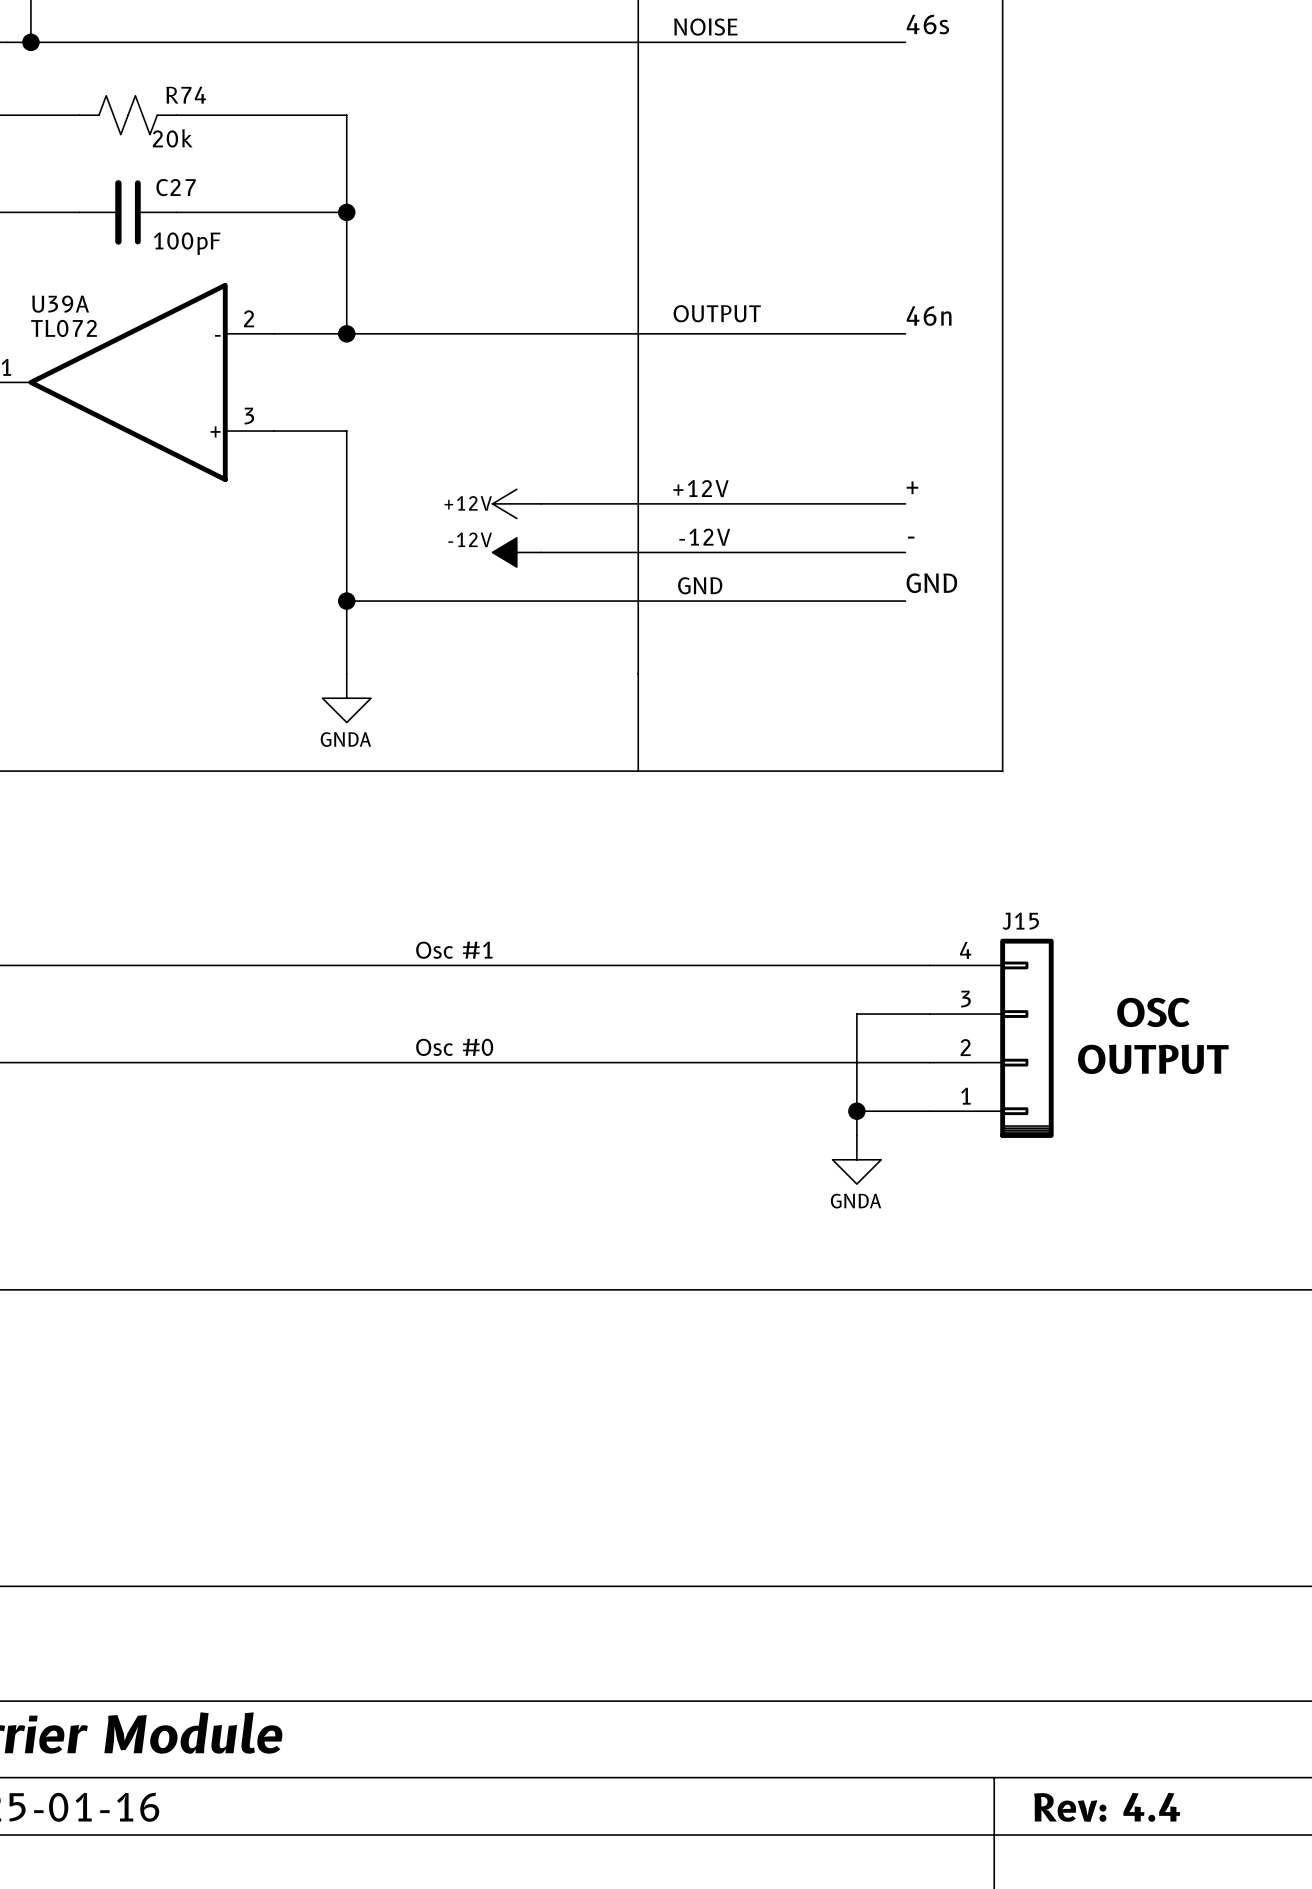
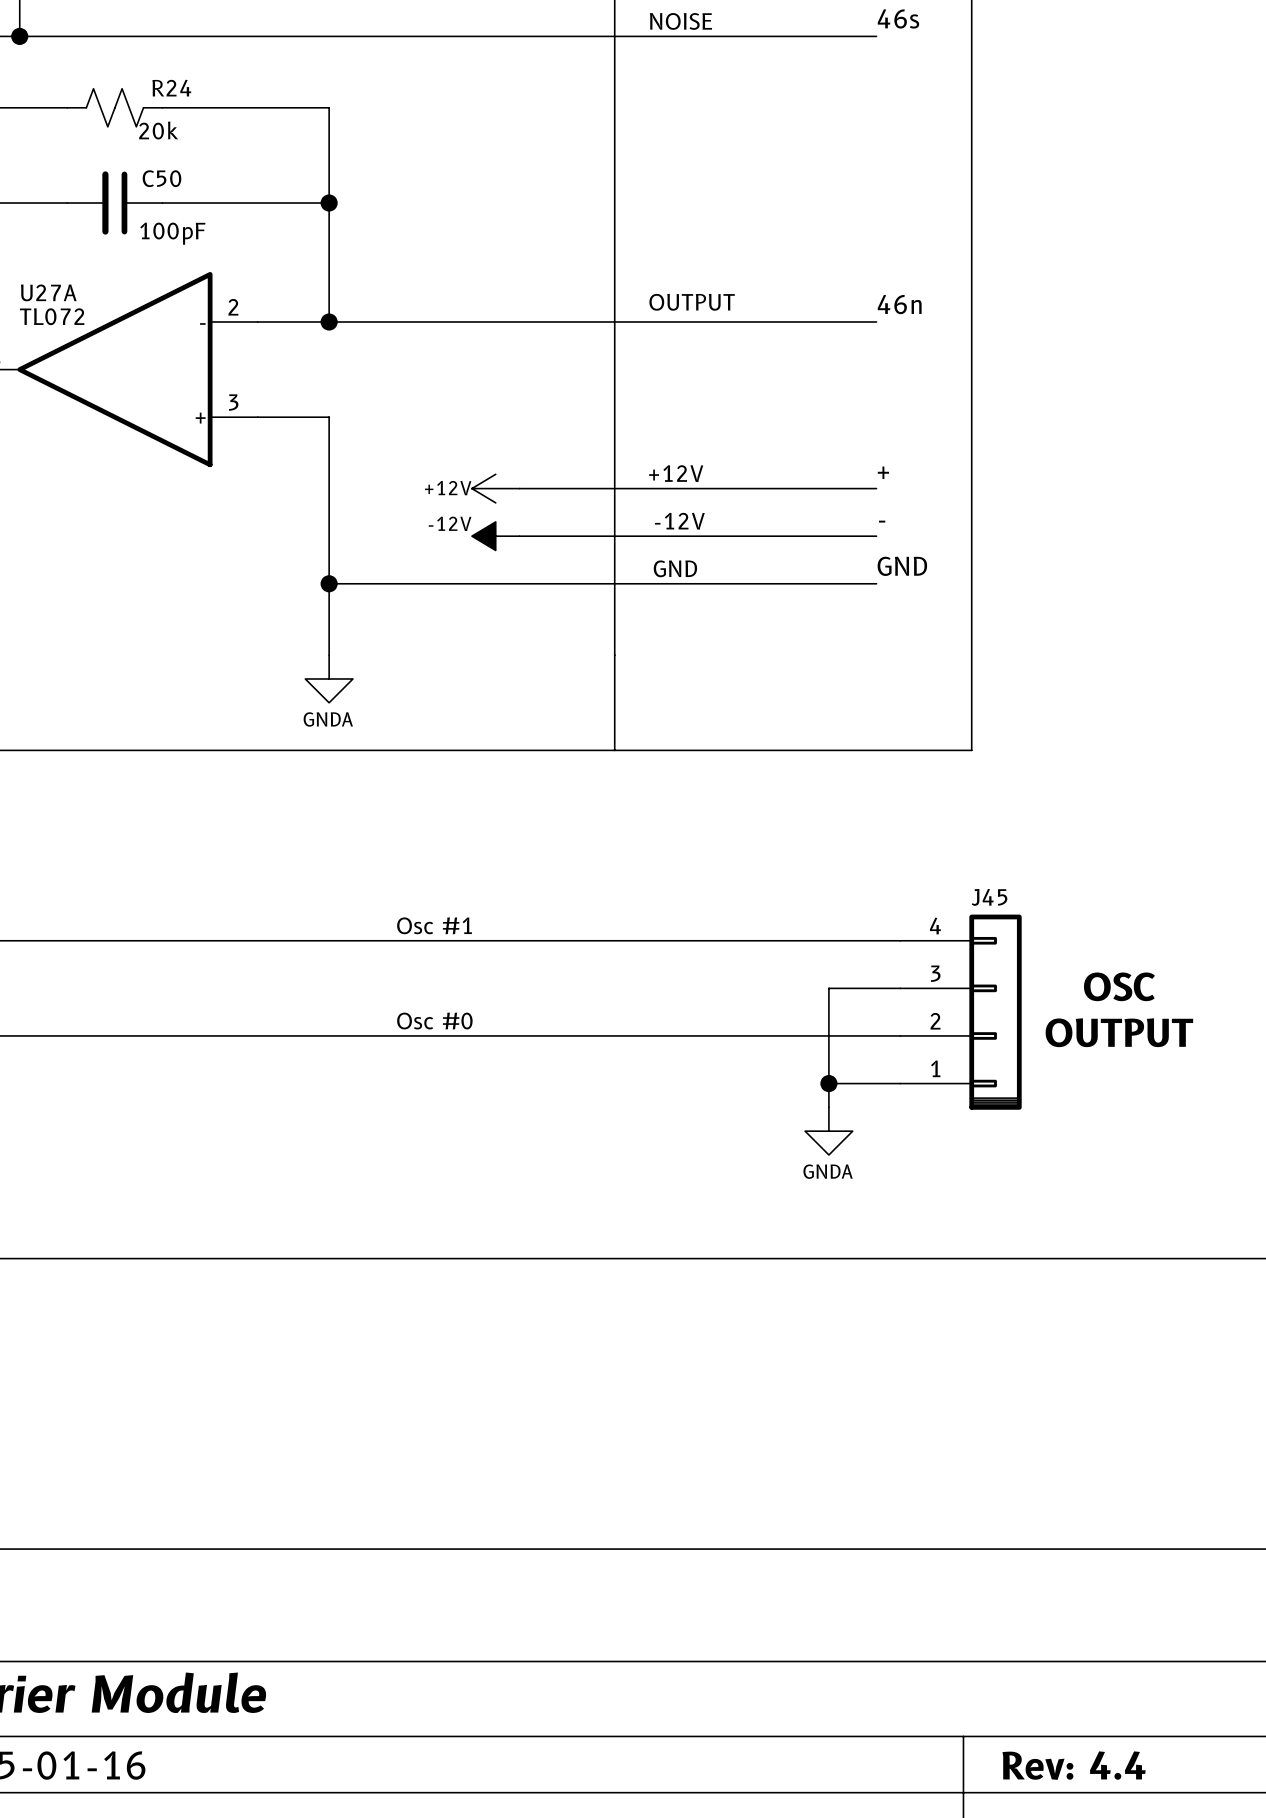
R74 name: R74 (186, 95) -> R24 (171, 88)
C27 name: C27 (176, 187) -> C50 (161, 178)
U39A name: U39A (60, 304) -> U27A (48, 292)
J15 name: J15 (1020, 921) -> J45 (989, 897)

